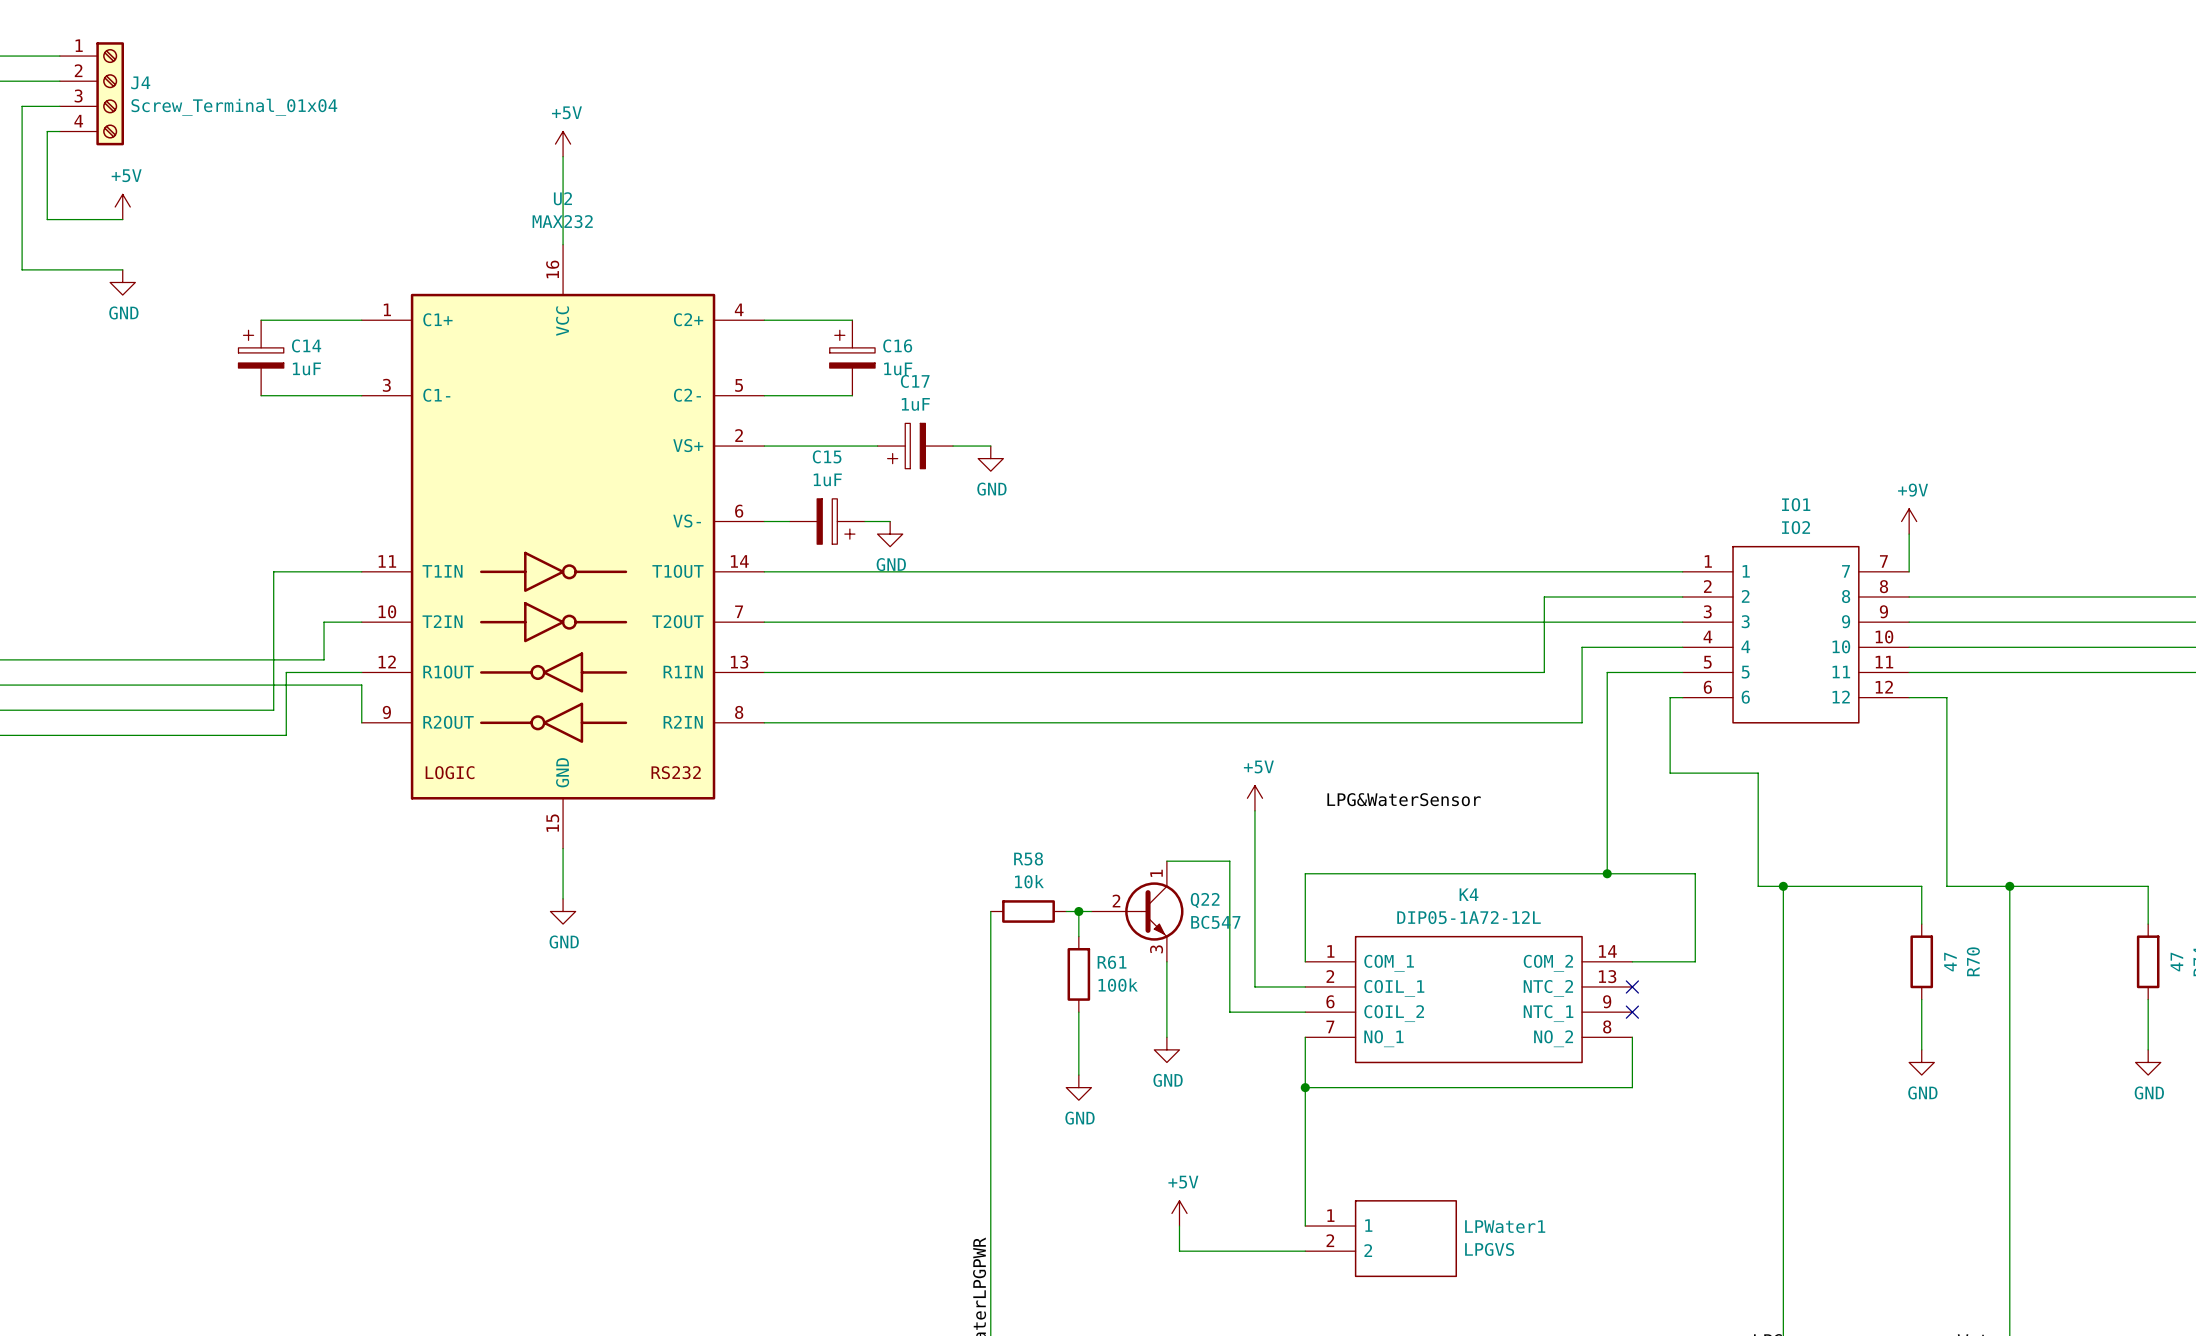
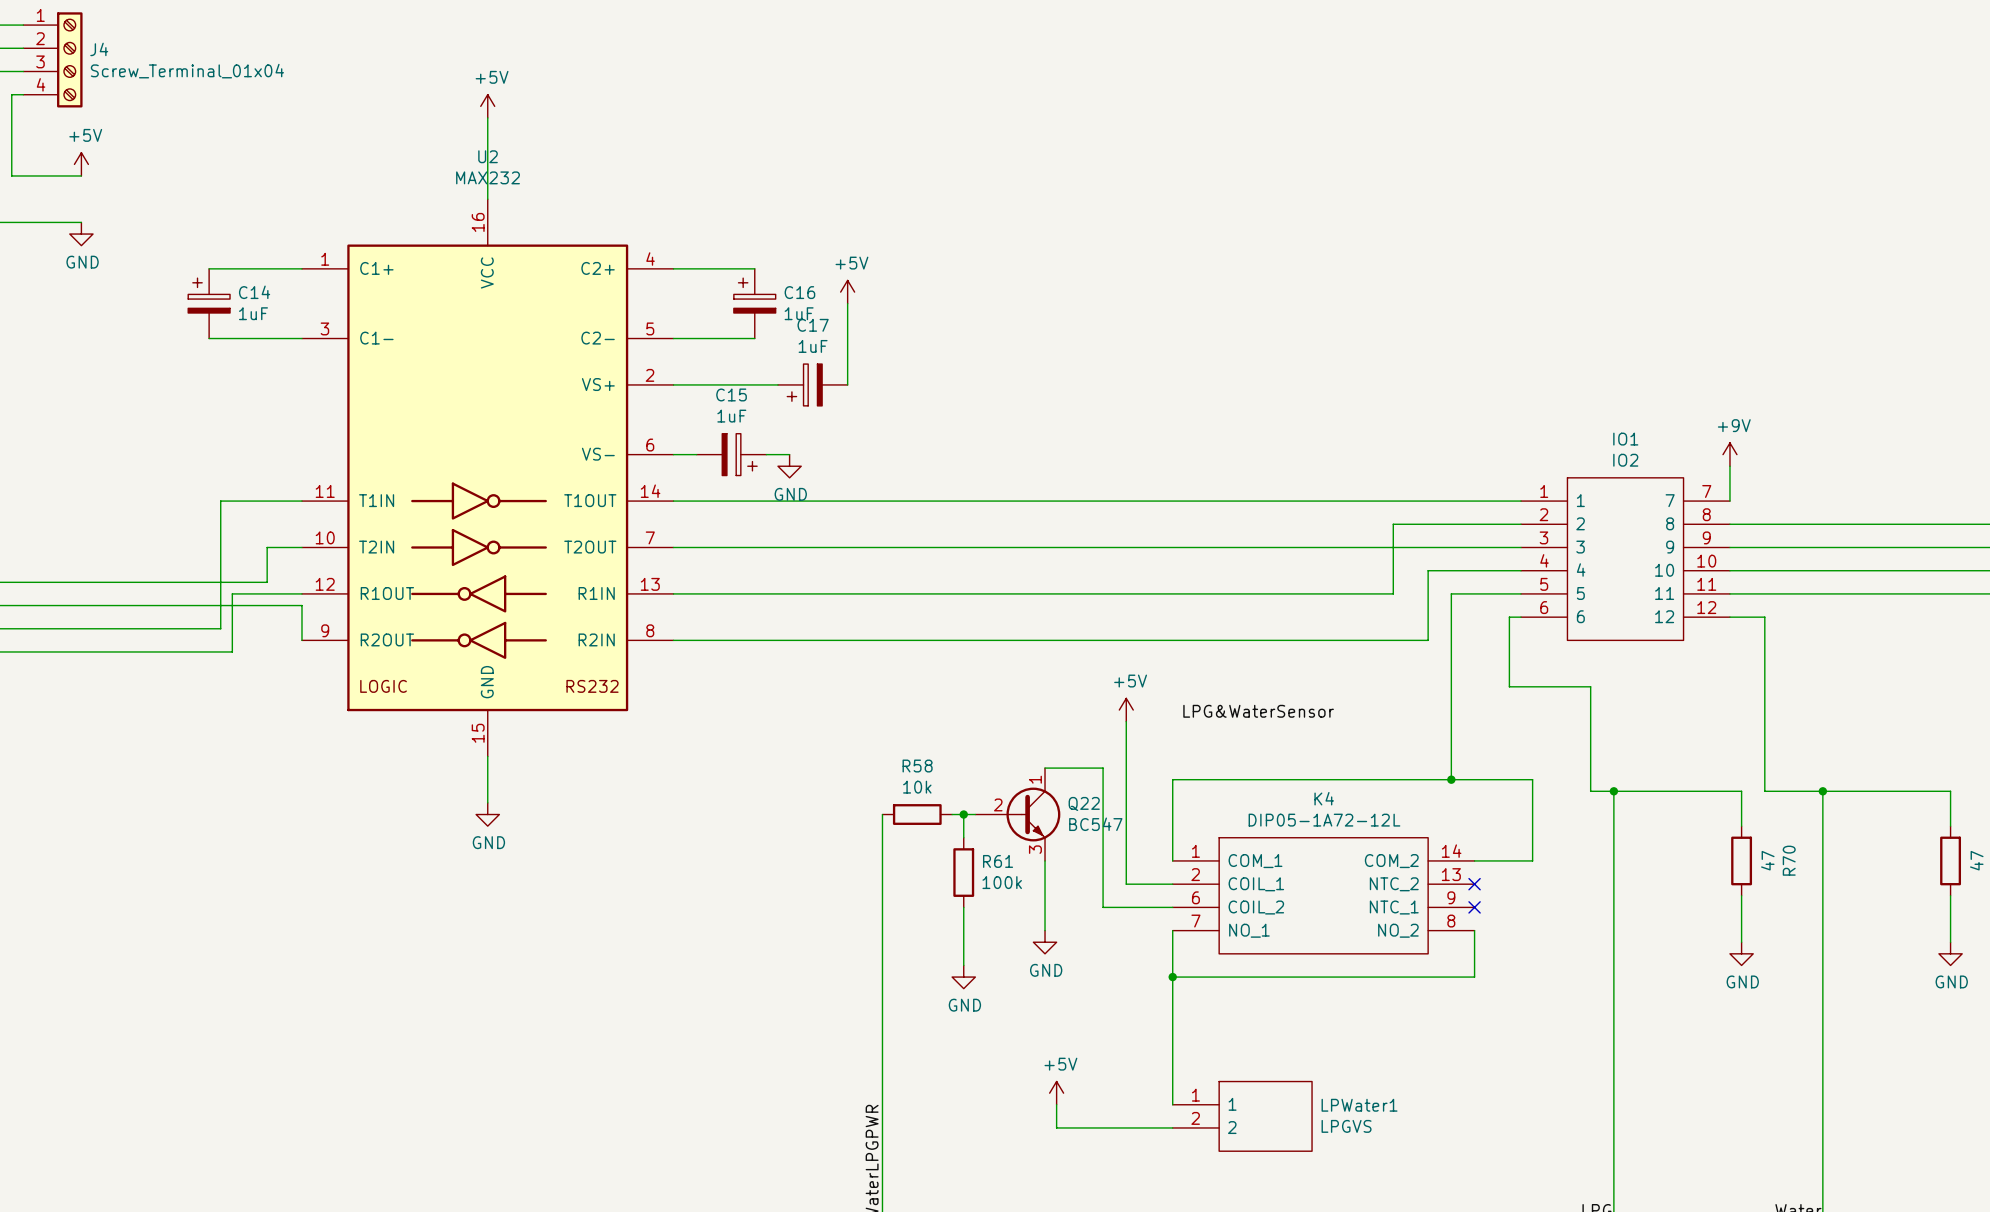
power symbol: none -> +5V (847, 292)
wire: (953, 446) (990, 446) -> (847, 384) (847, 303)
power symbol: GND (990, 458) -> none

